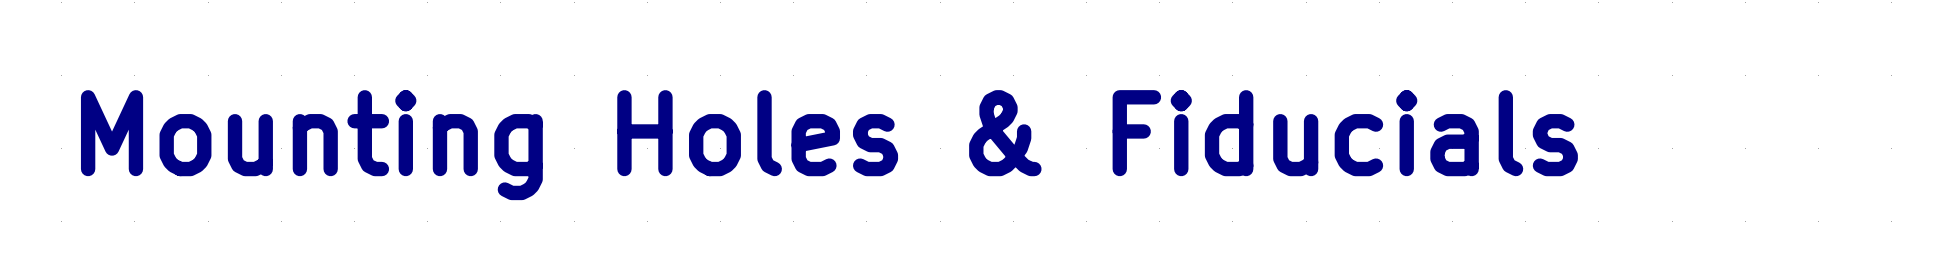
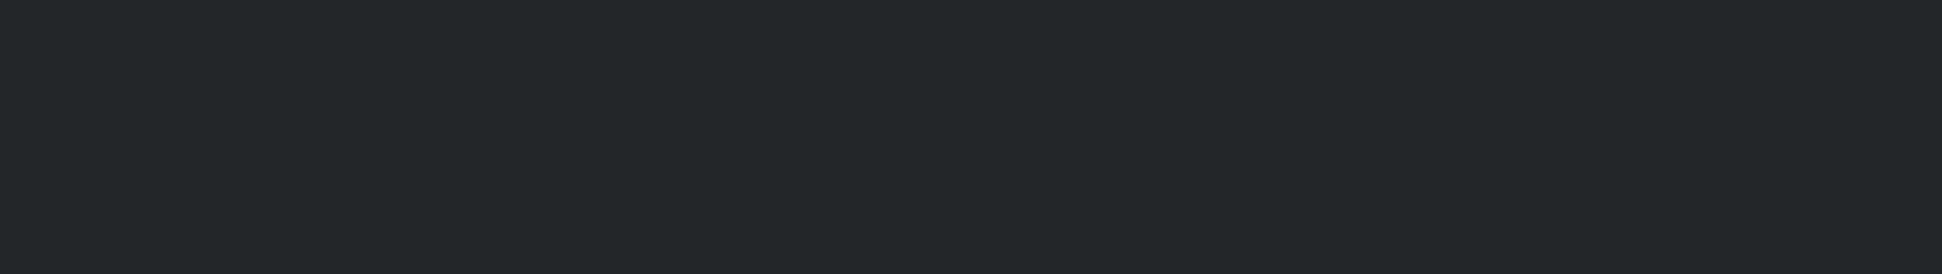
text: Mounting Holes & Fiducials (829, 145) -> none

